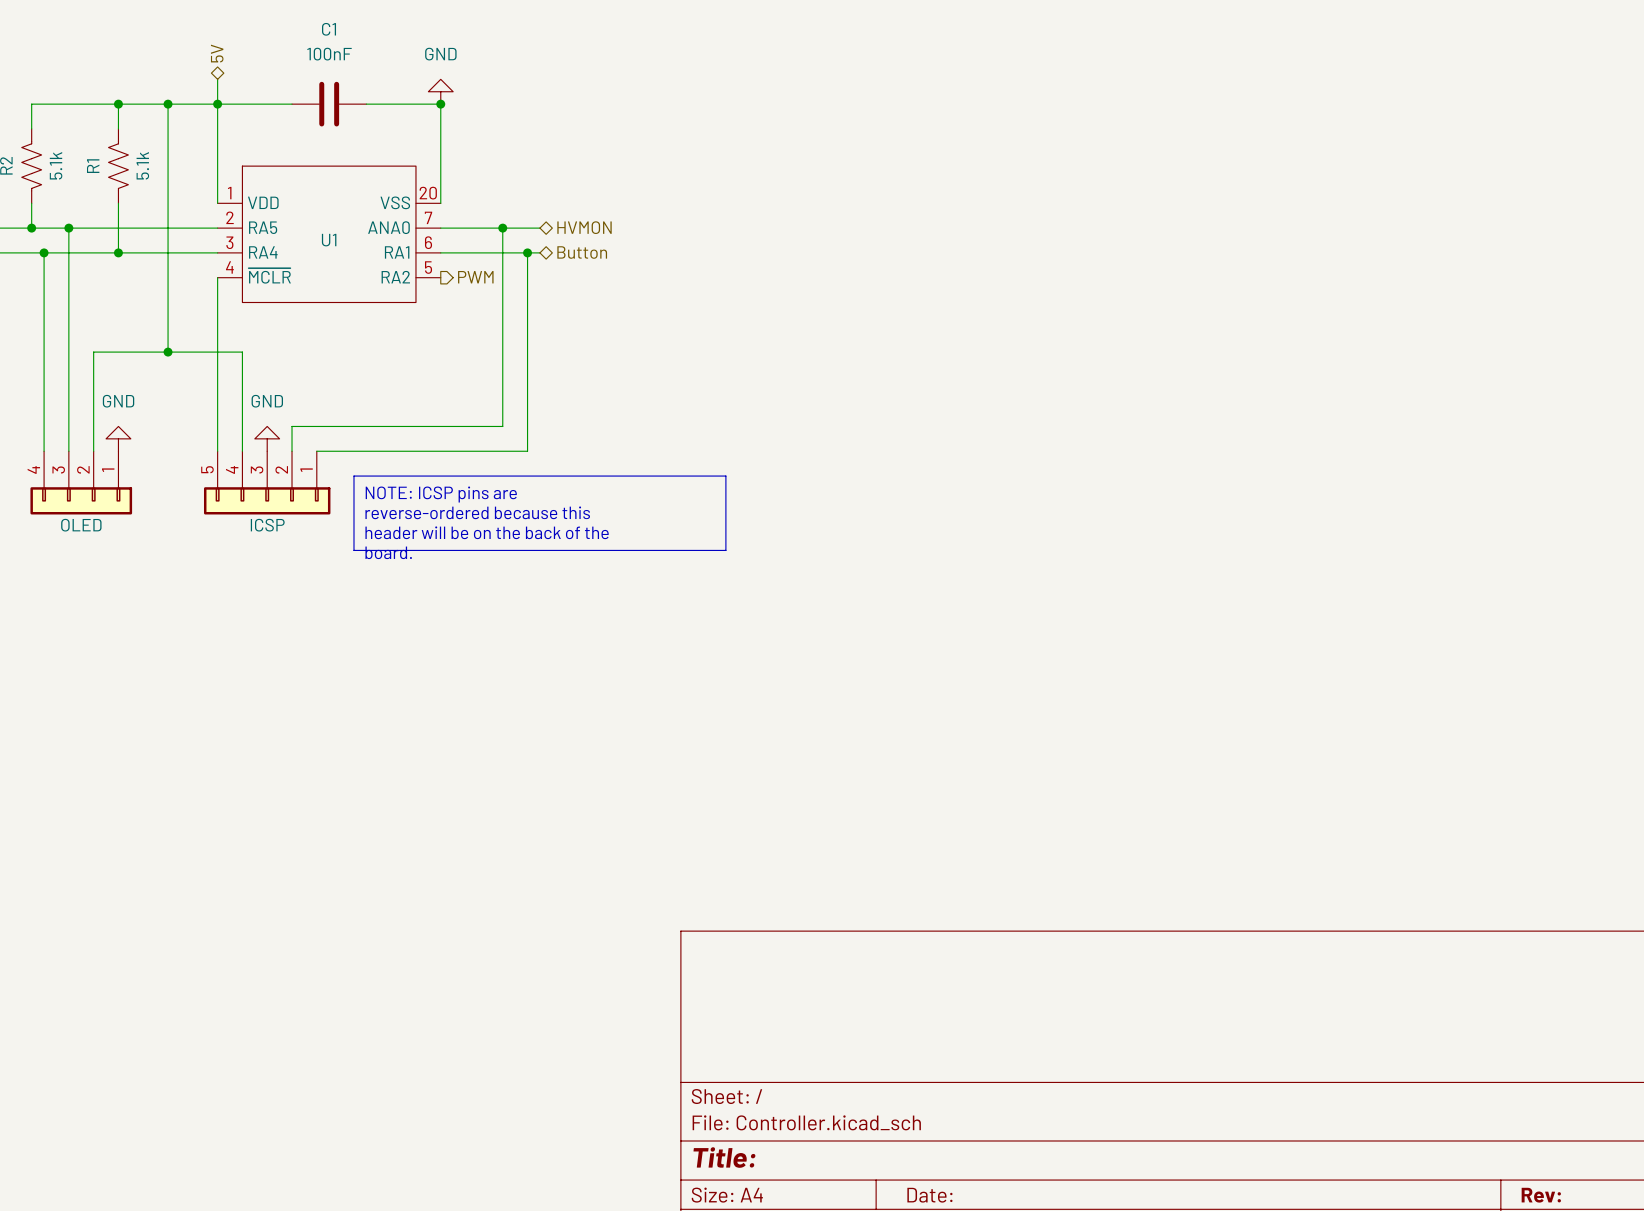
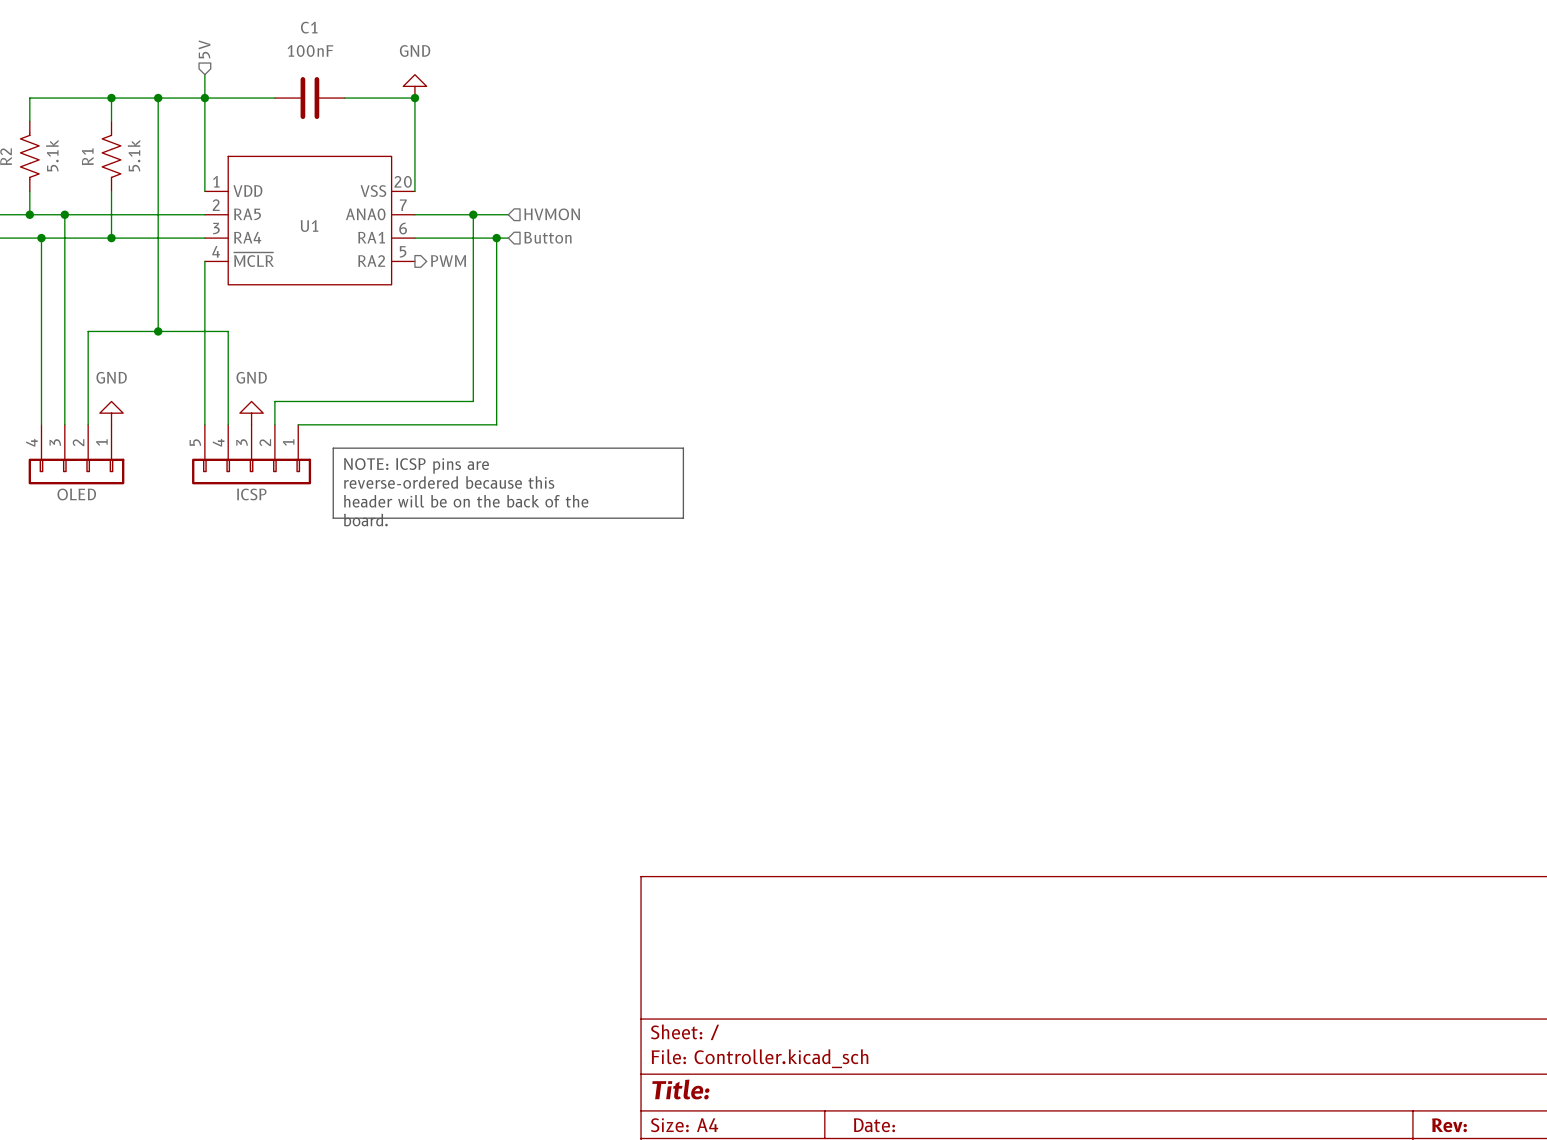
hierarchical label shape: bidirectional (217, 53) -> input (204, 49)
hierarchical label shape: bidirectional (584, 227) -> input (552, 214)
hierarchical label shape: bidirectional (582, 252) -> input (547, 237)

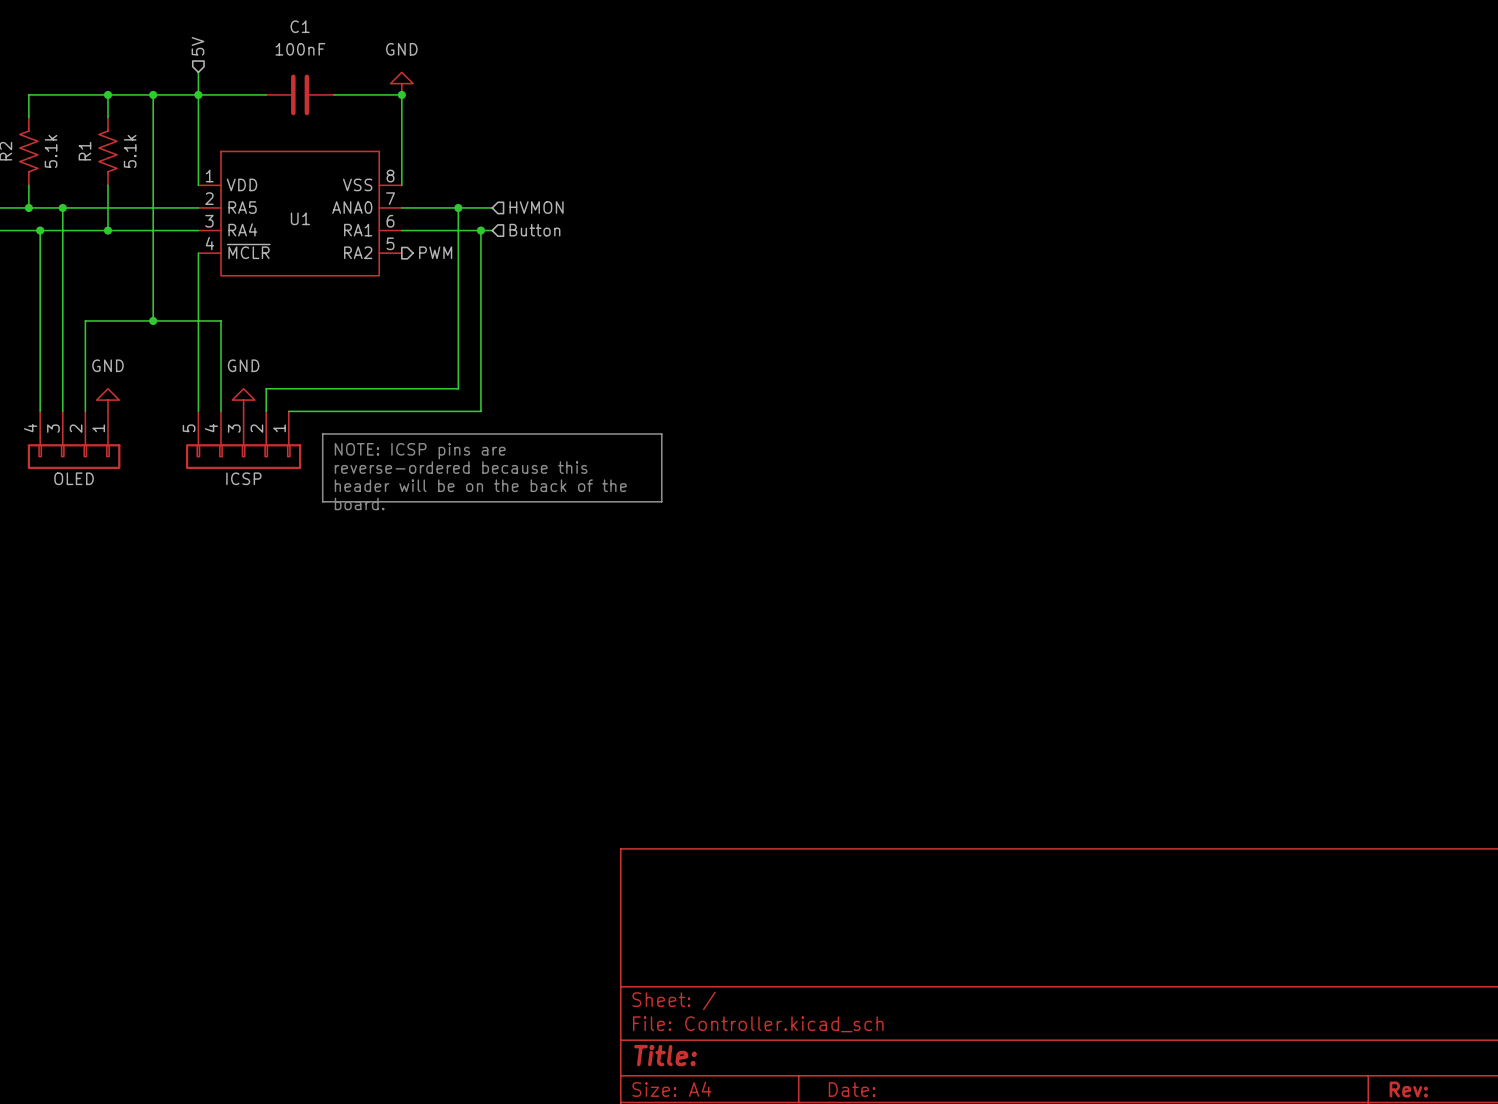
U1 pin number: 20 (403, 181) -> 8 (390, 176)

